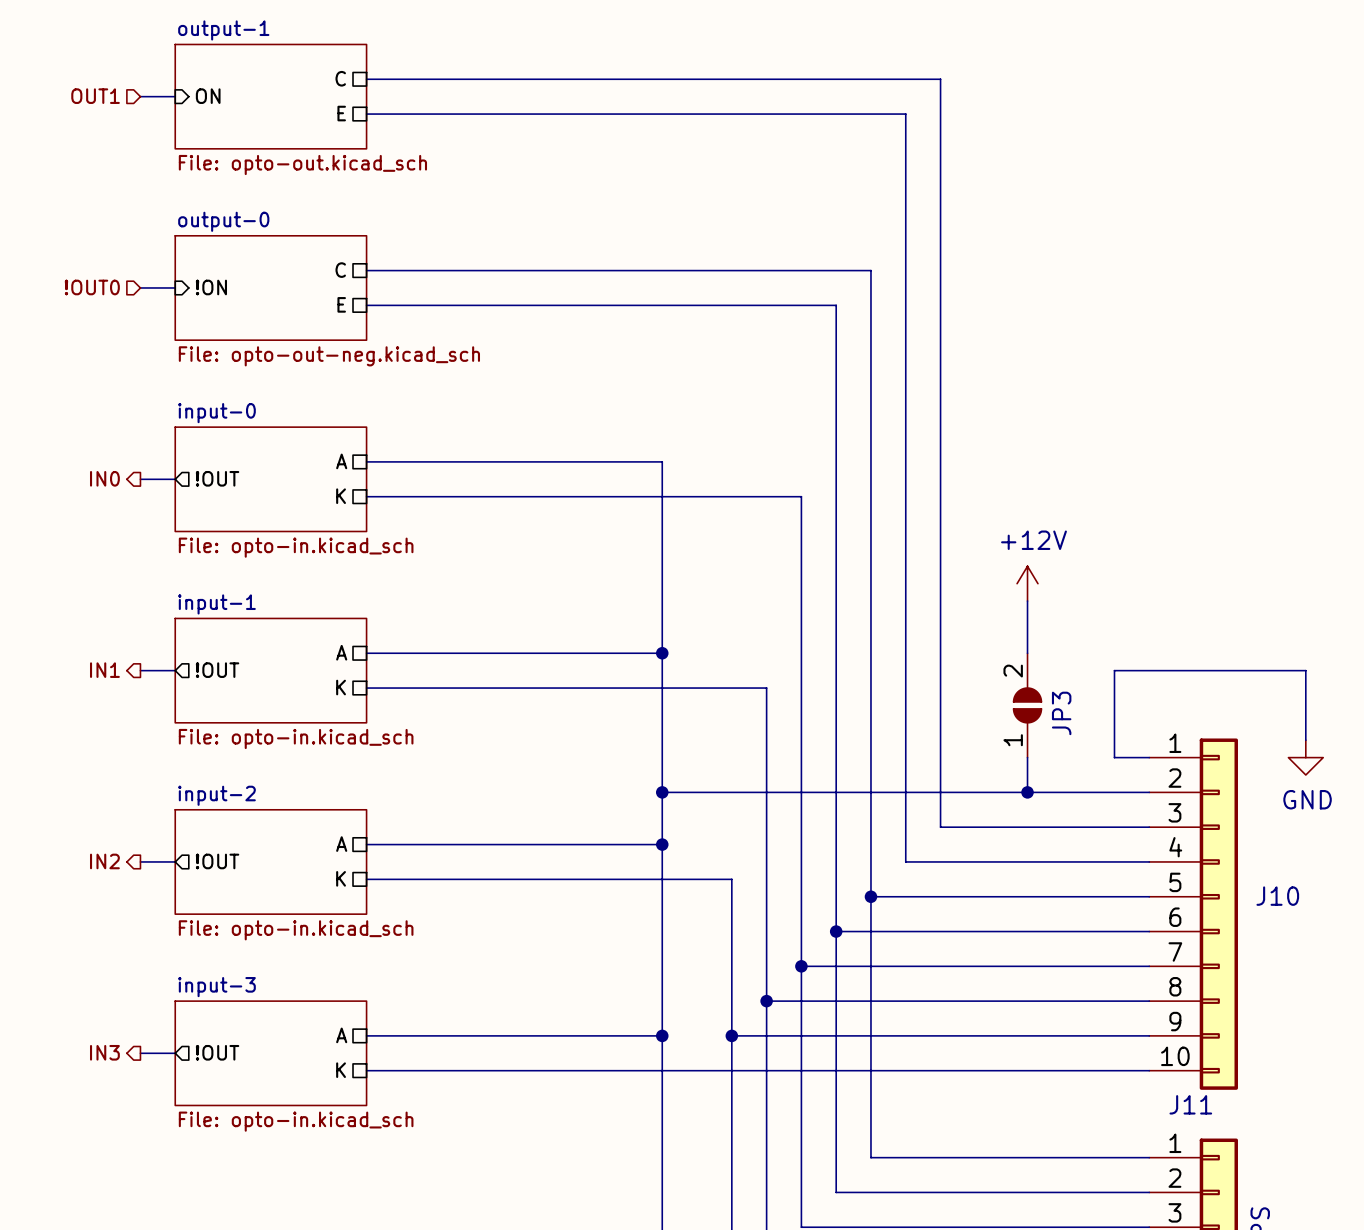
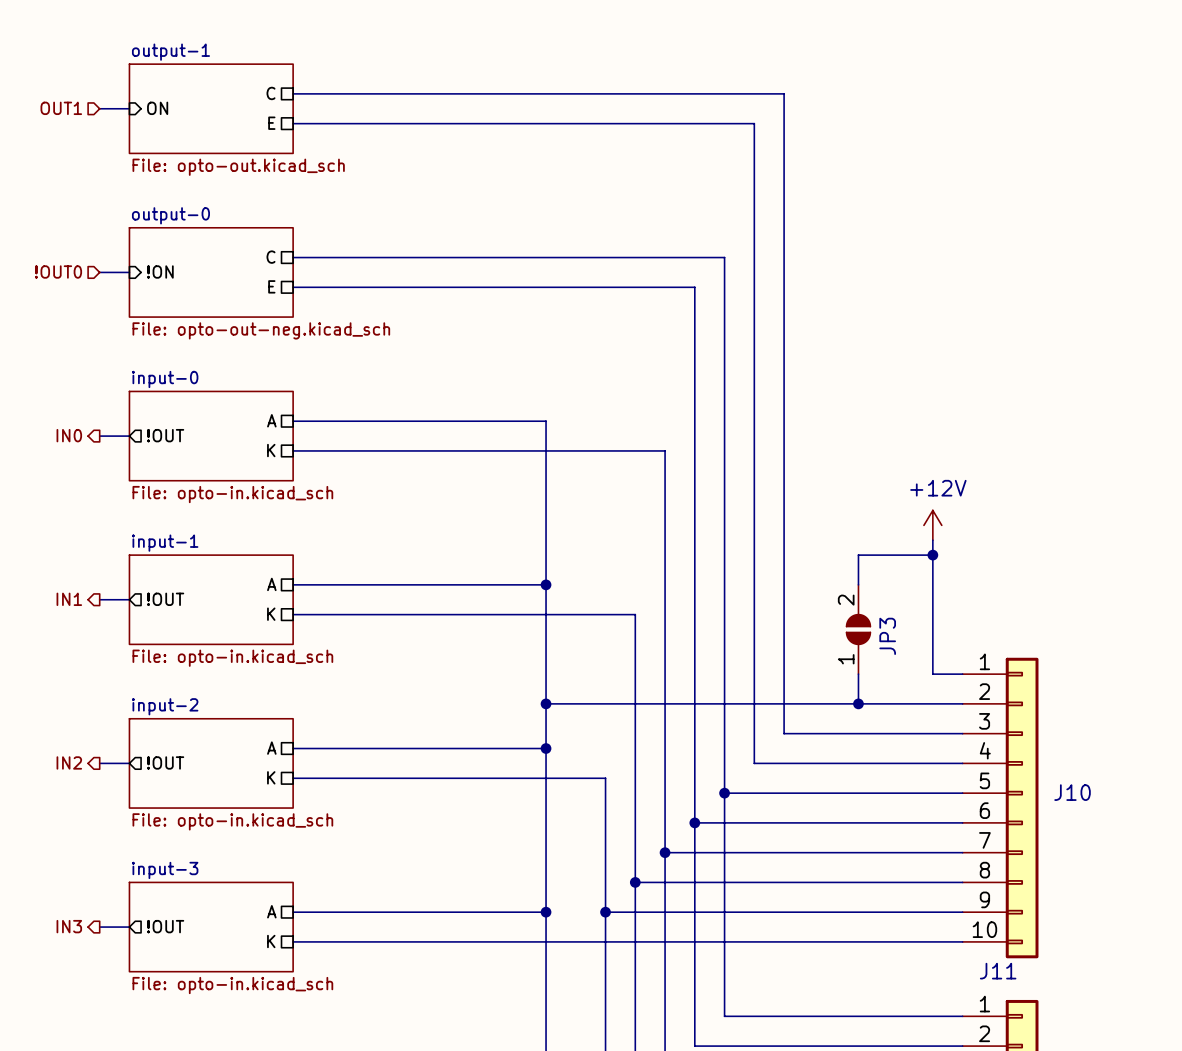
power symbol position: +12V (1027, 583) -> +12V (932, 525)
wire: (1027, 601) (1027, 618) -> (932, 555) (858, 555)
junction: none -> (932, 555)
wire: (1114, 670) (1305, 670) (1305, 740) -> (932, 599) (932, 540)
power symbol: GND (1305, 757) -> none

